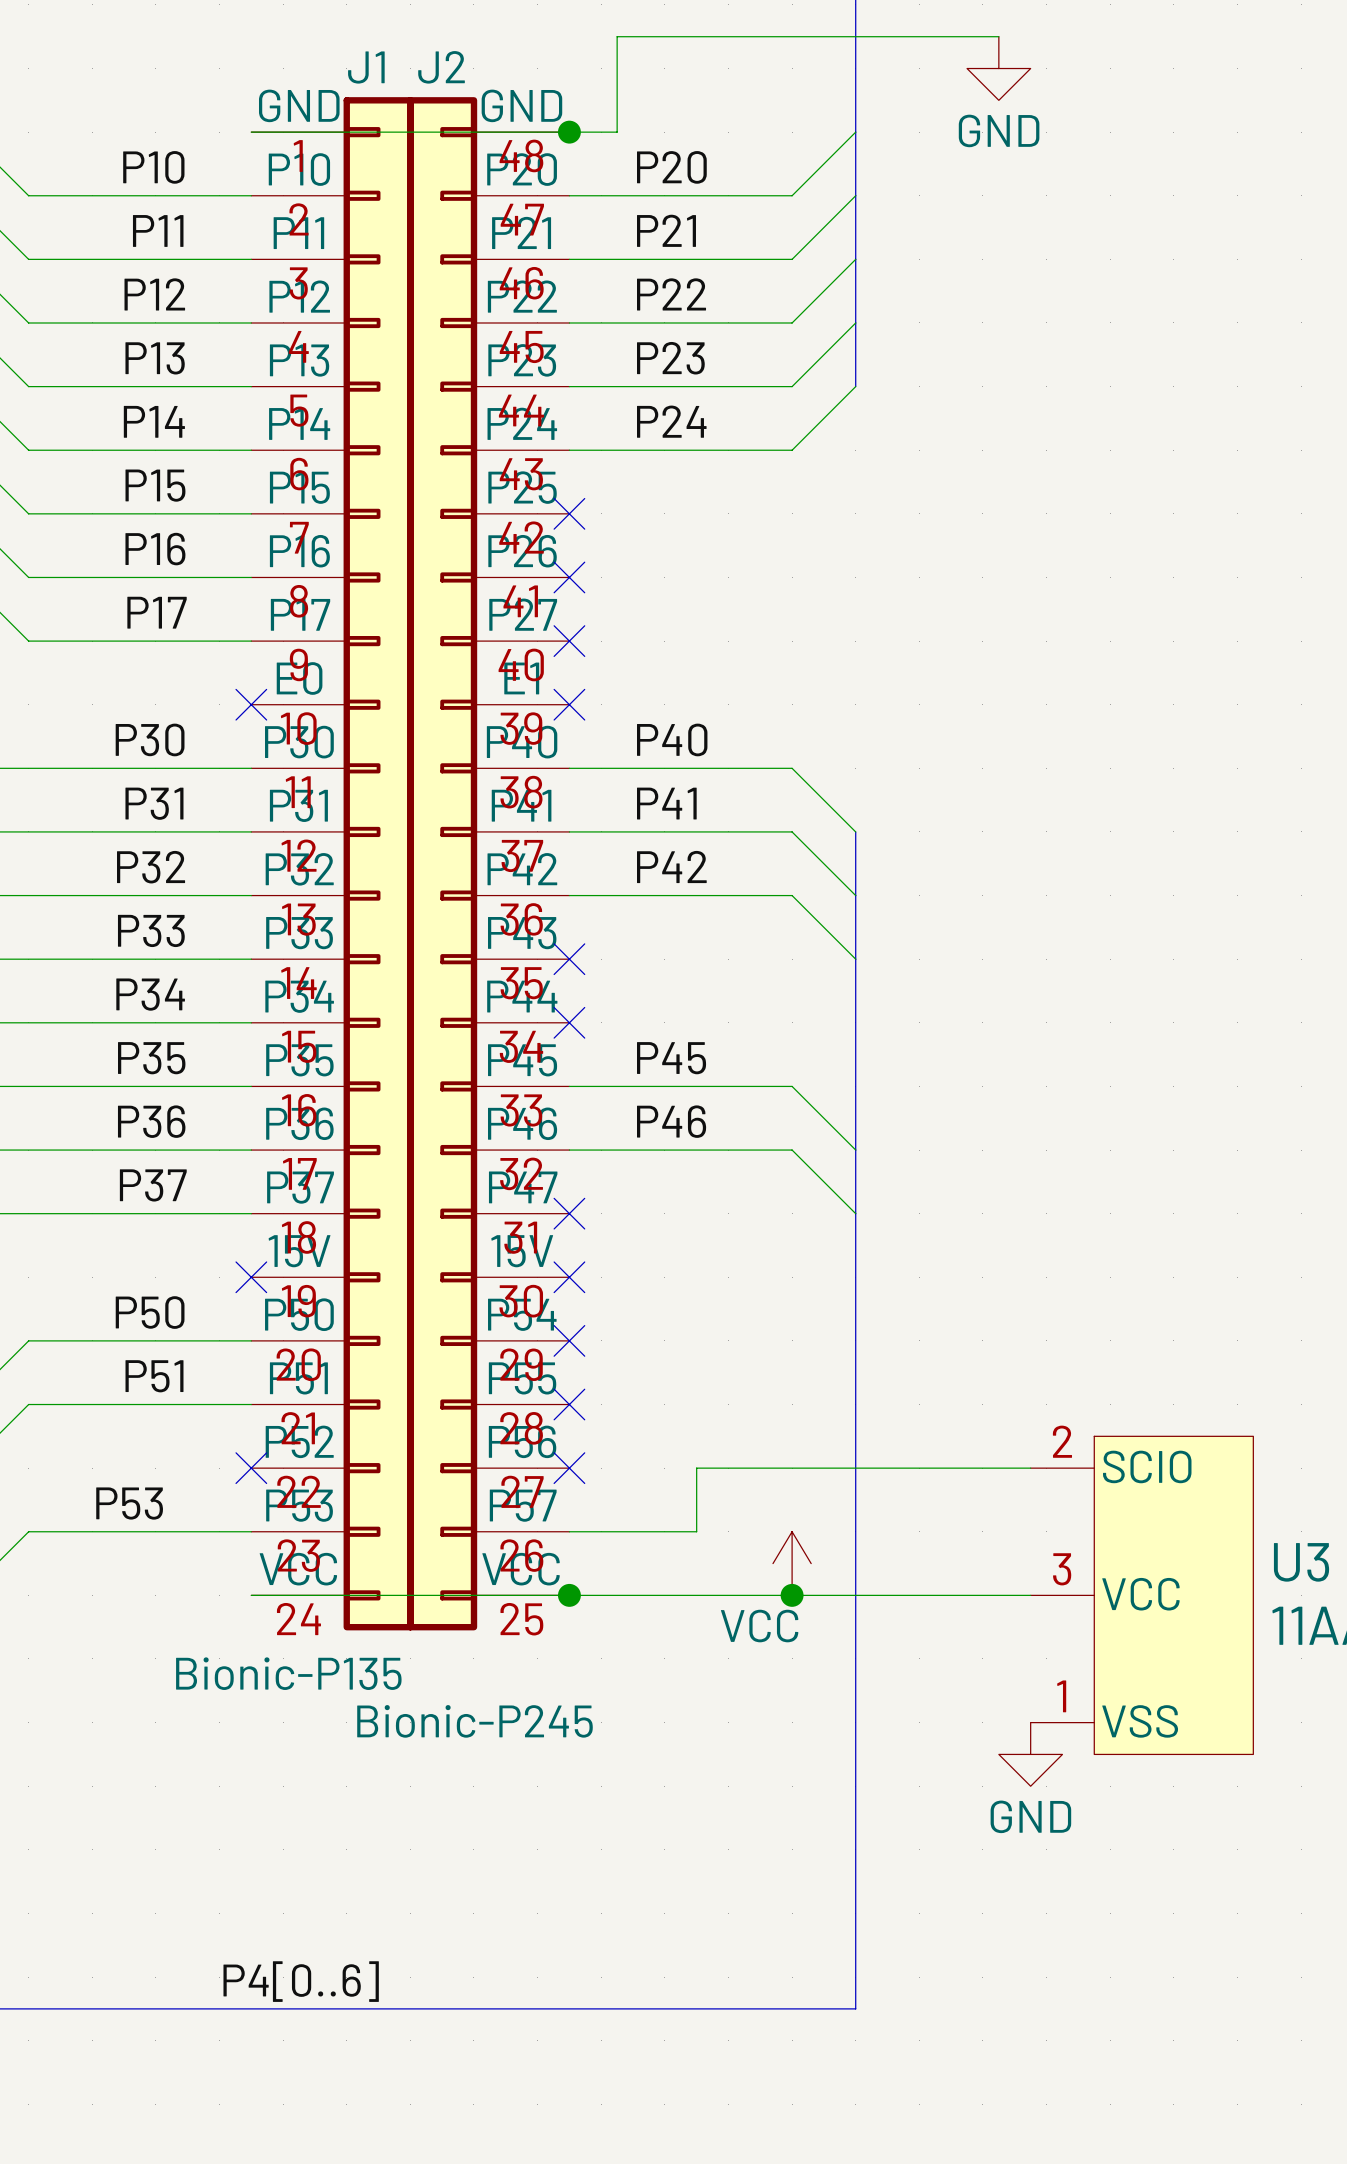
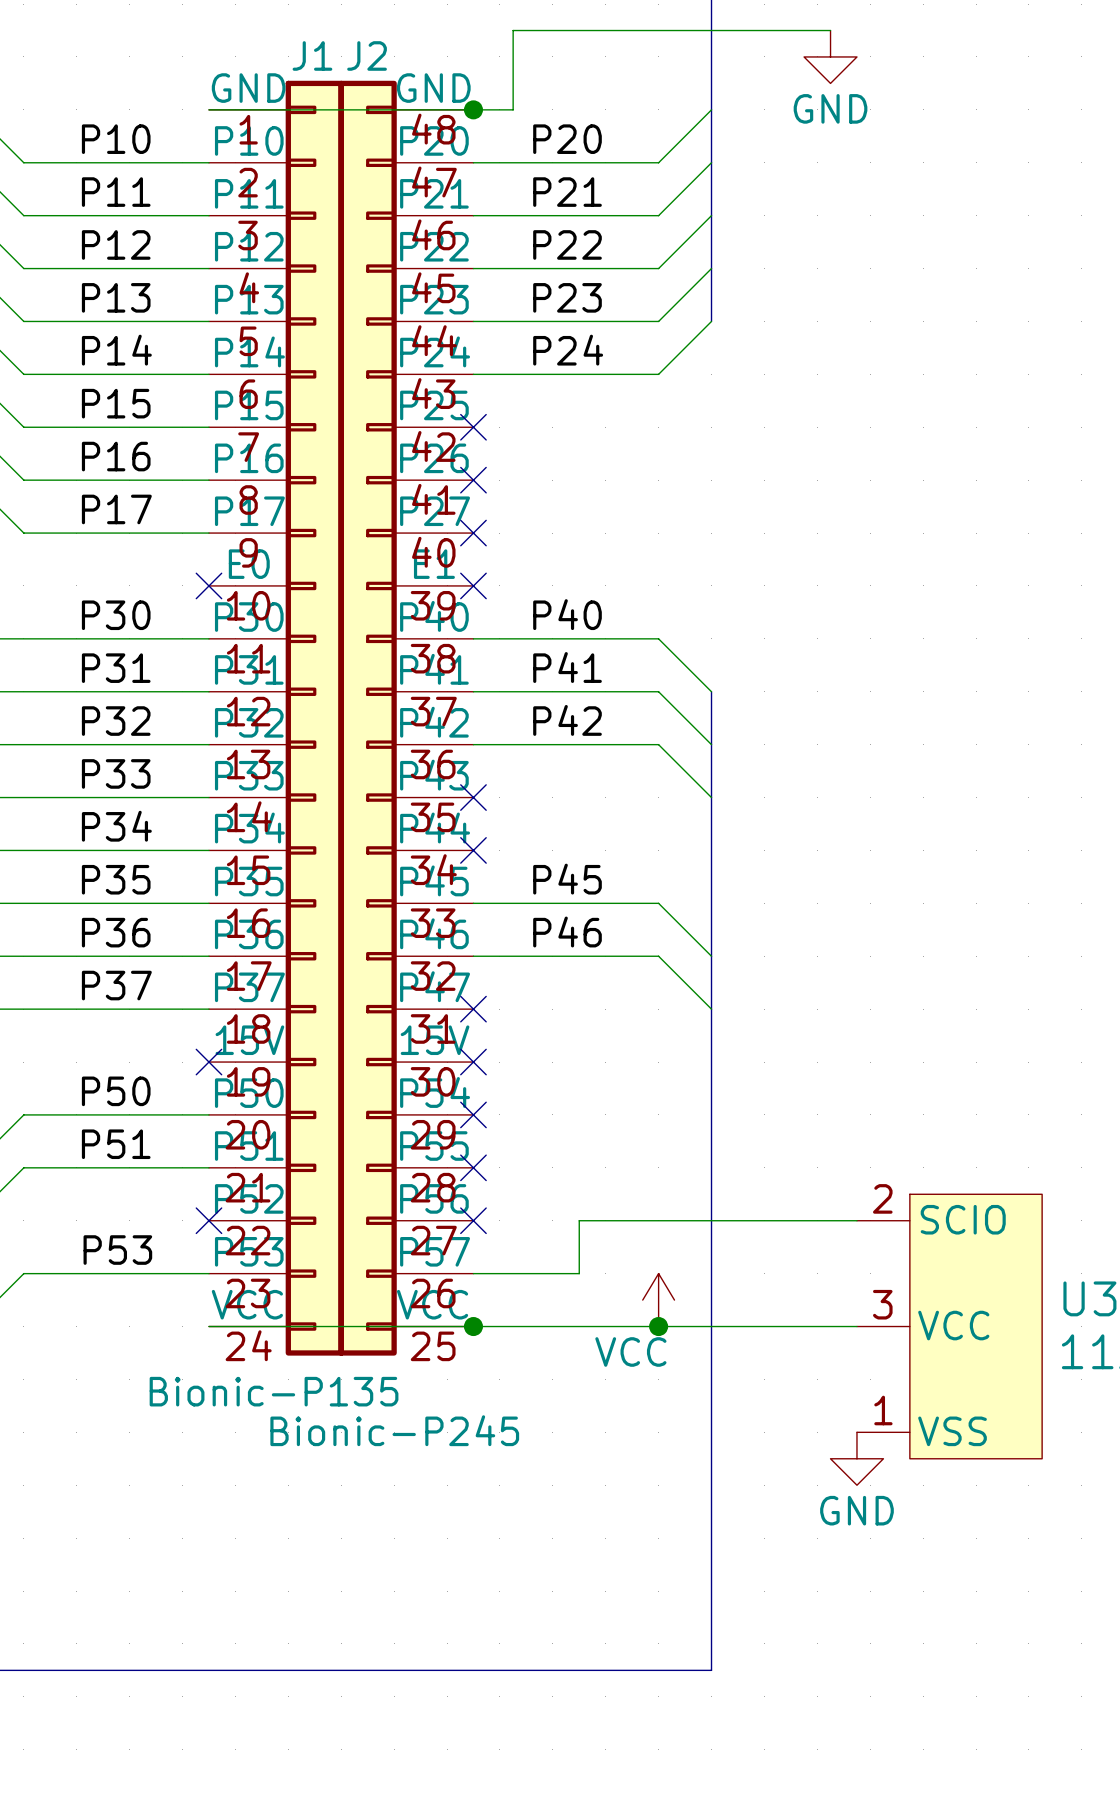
label: P4[0..6] (301, 1981) -> none

